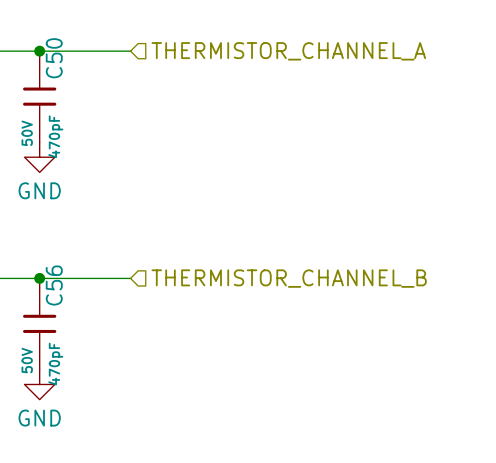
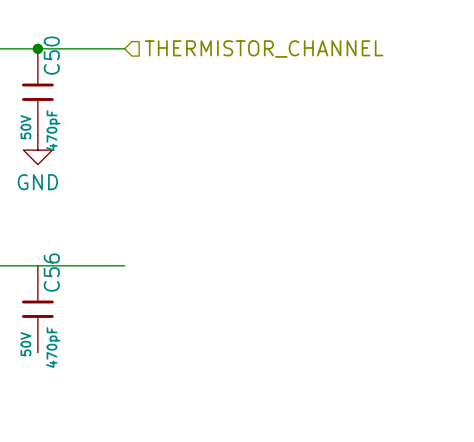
hierarchical label: THERMISTOR_CHANNEL_A (288, 51) -> THERMISTOR_CHANNEL (264, 48)
junction: (39, 278) -> none
hierarchical label: THERMISTOR_CHANNEL_B (289, 278) -> none
power symbol: GND (39, 384) -> none

